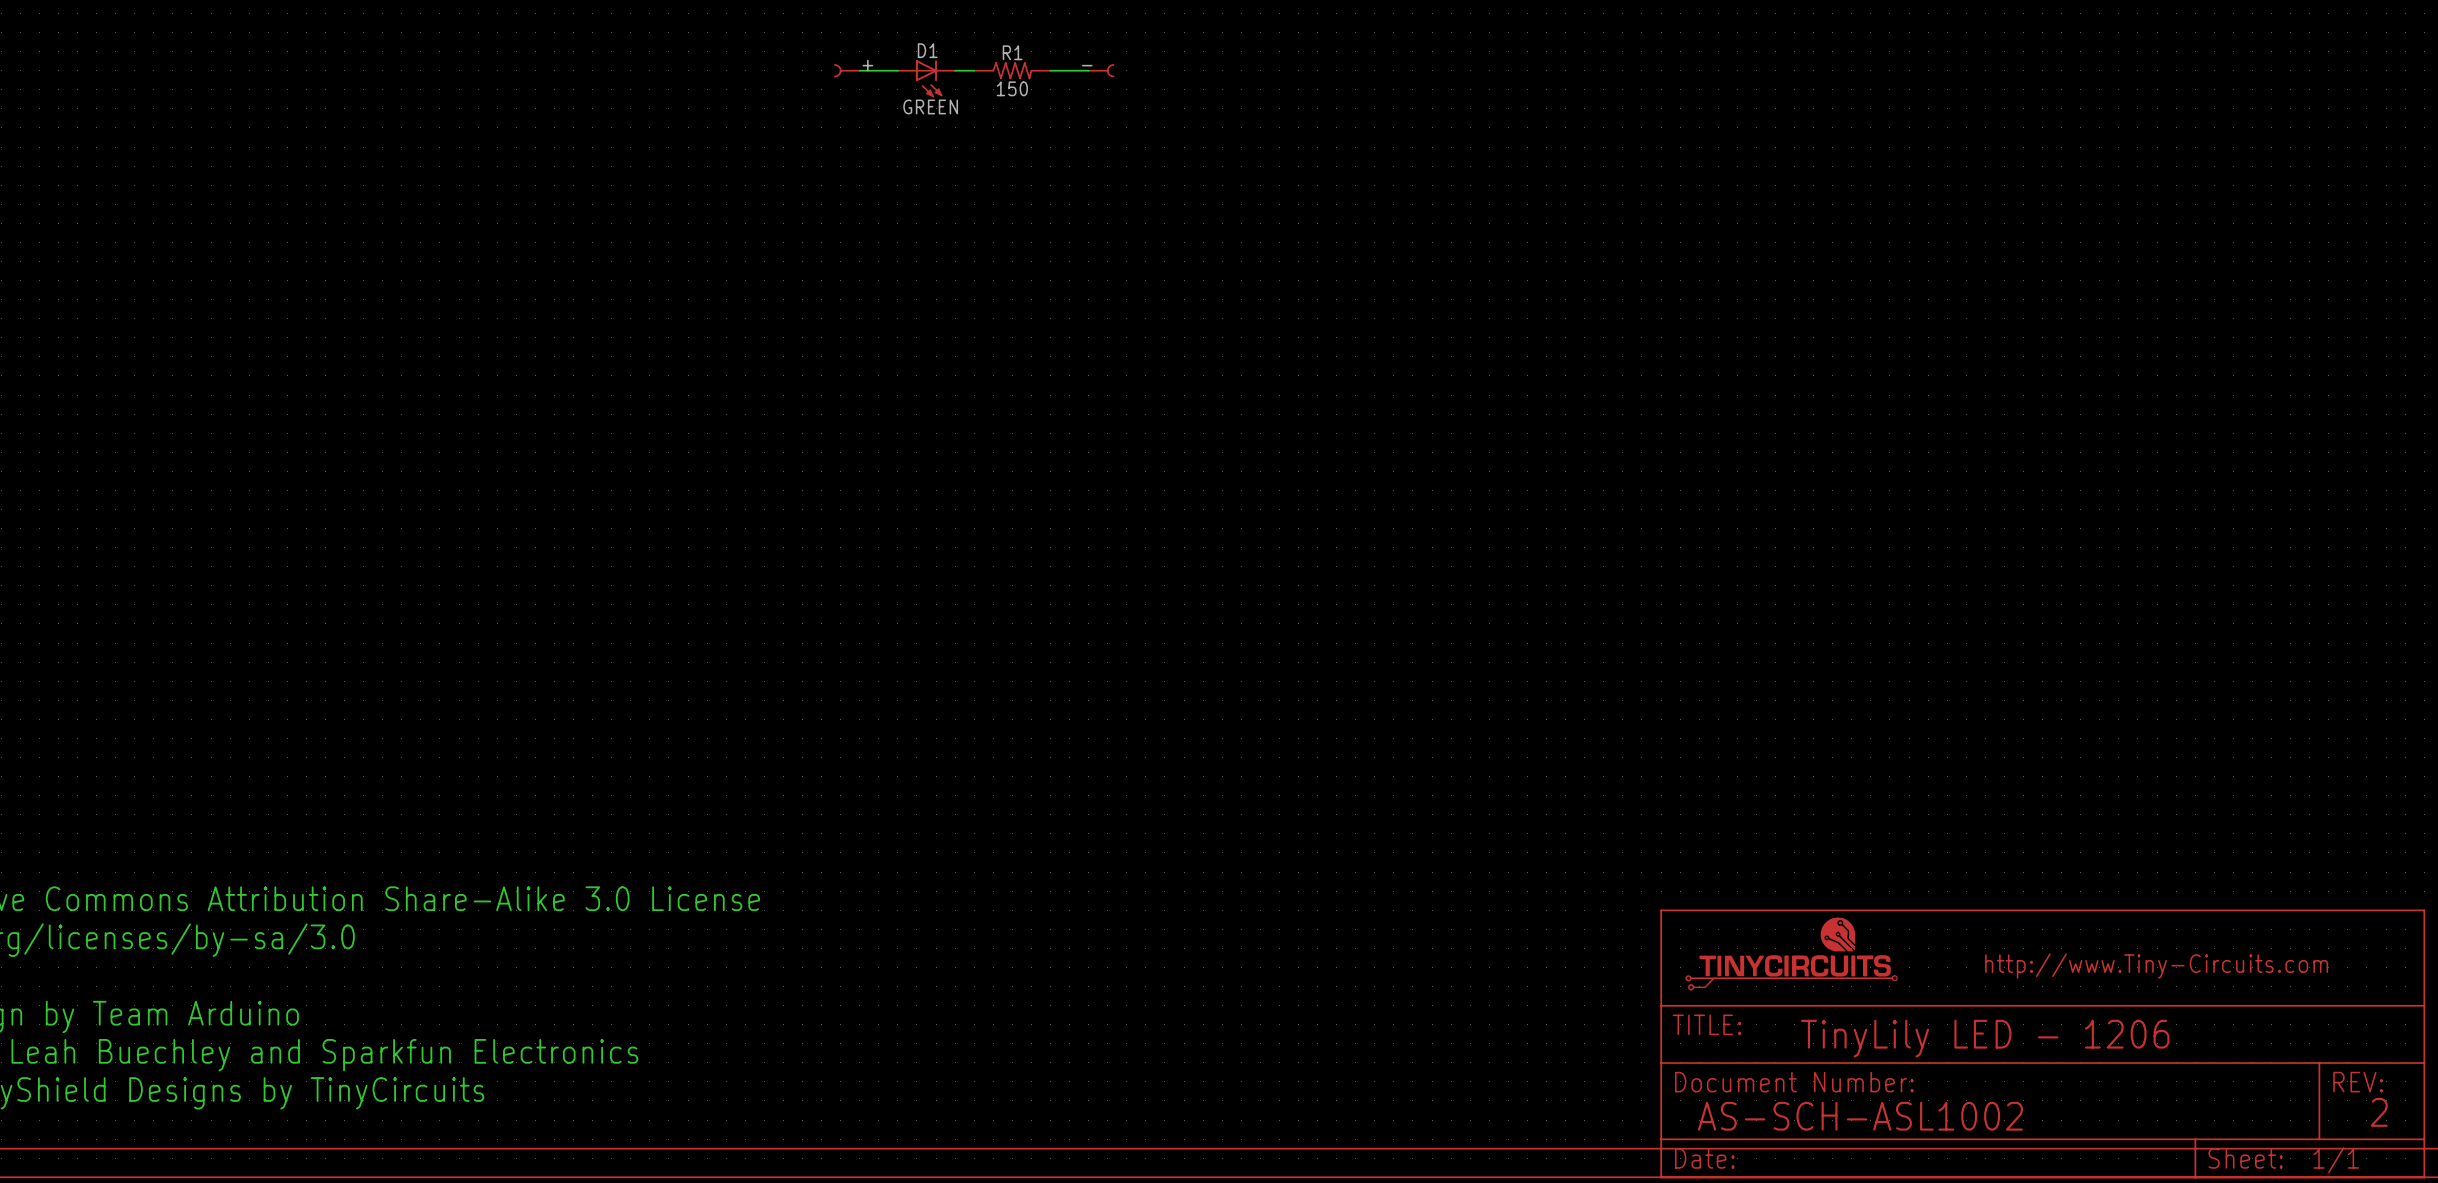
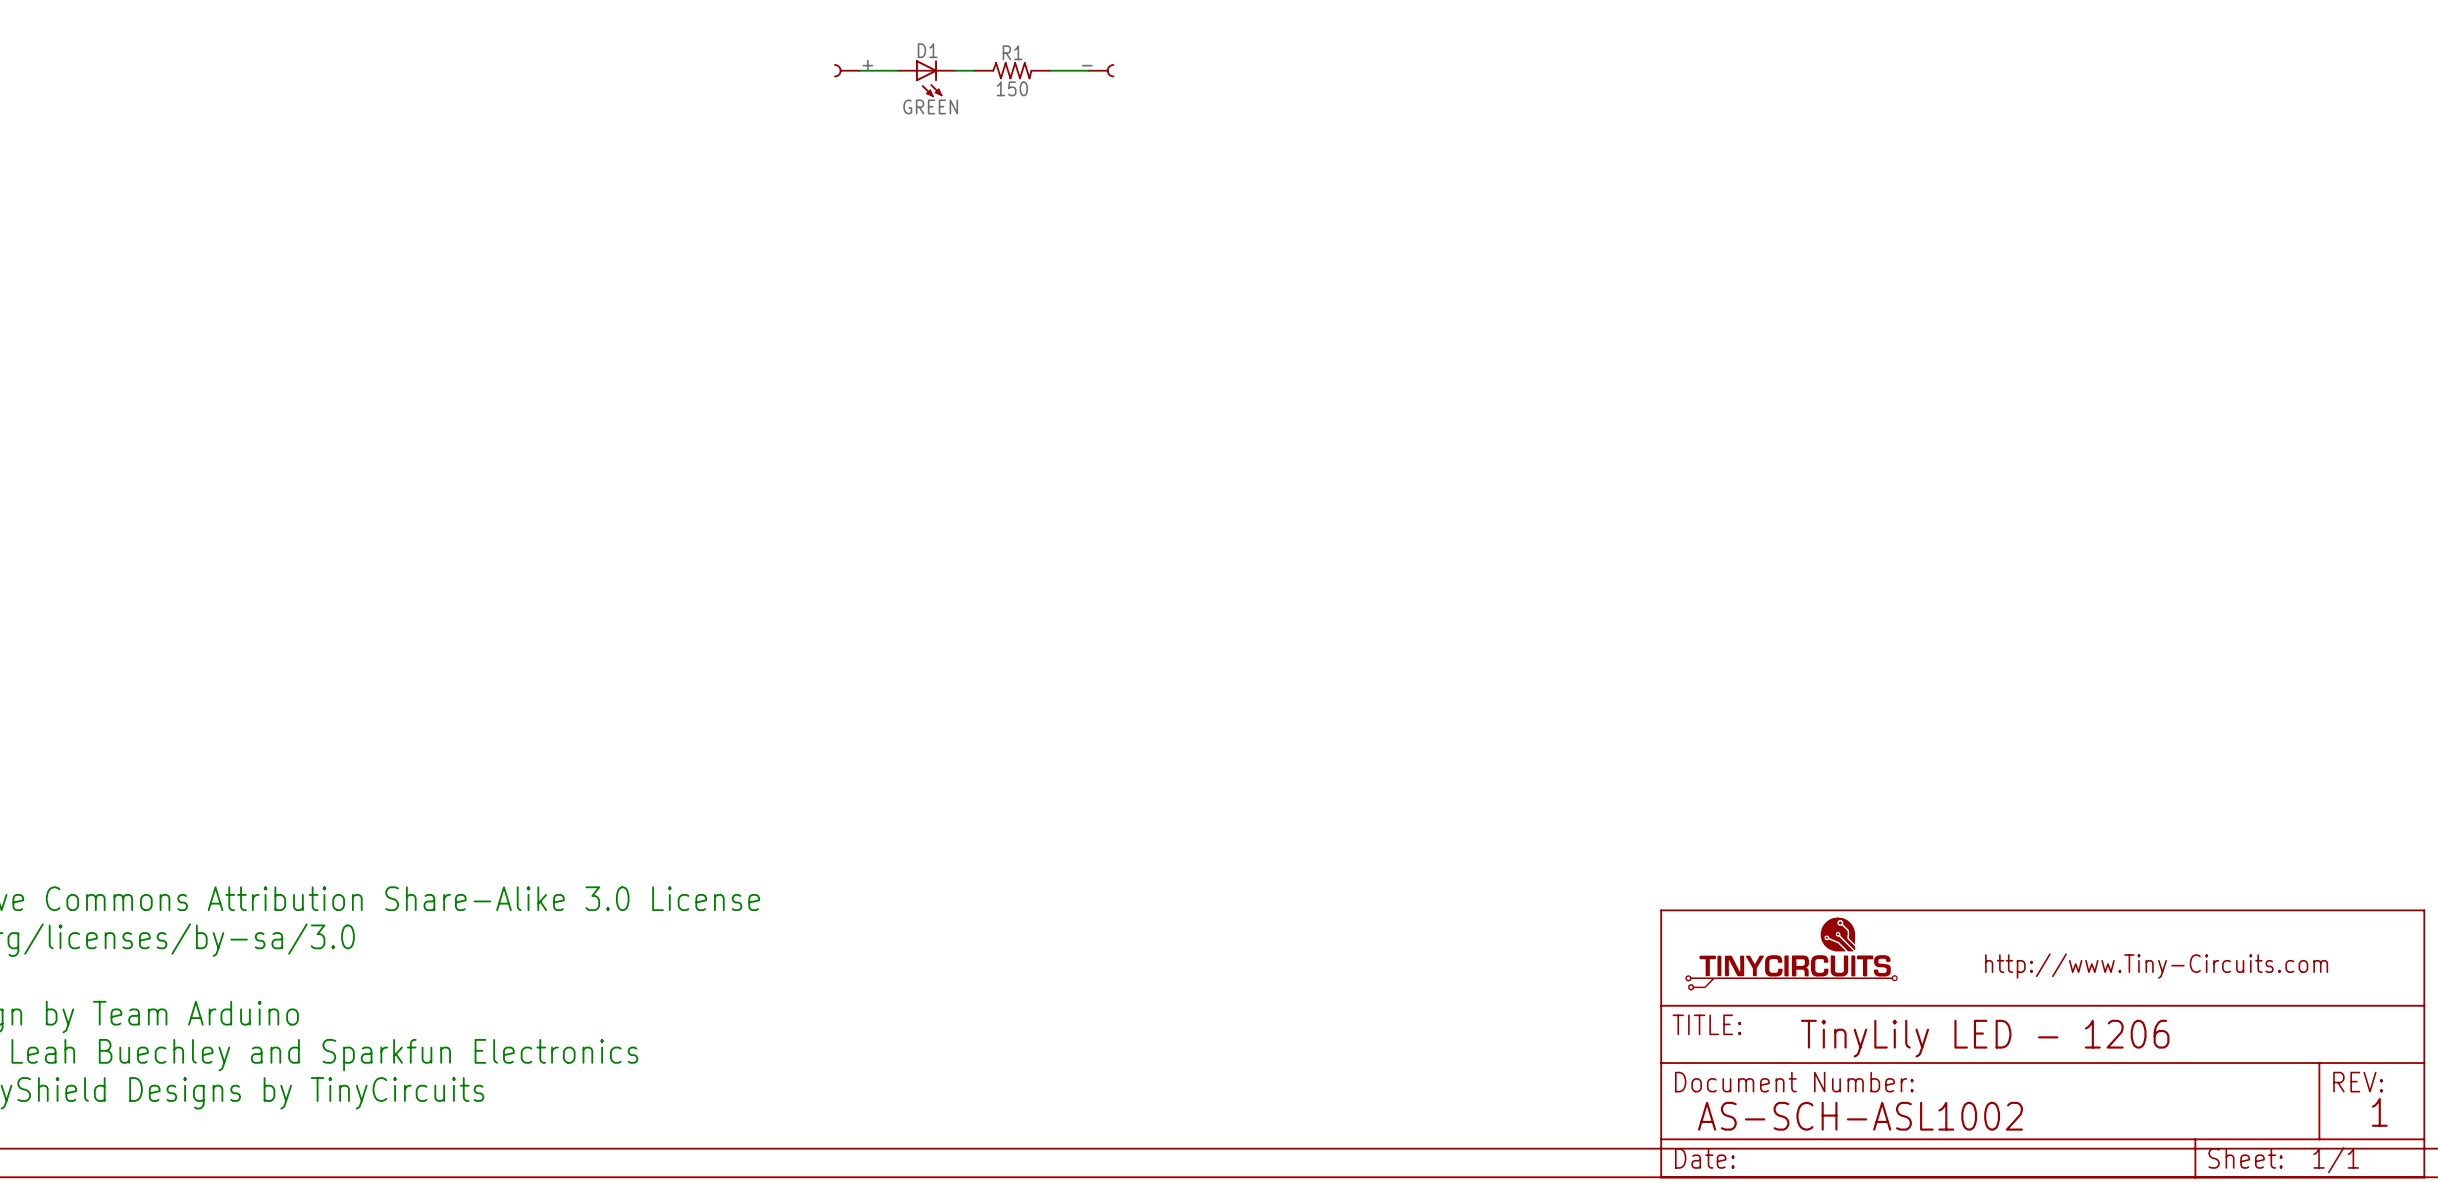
text: 2 (2379, 1112) -> 1 (2379, 1112)

